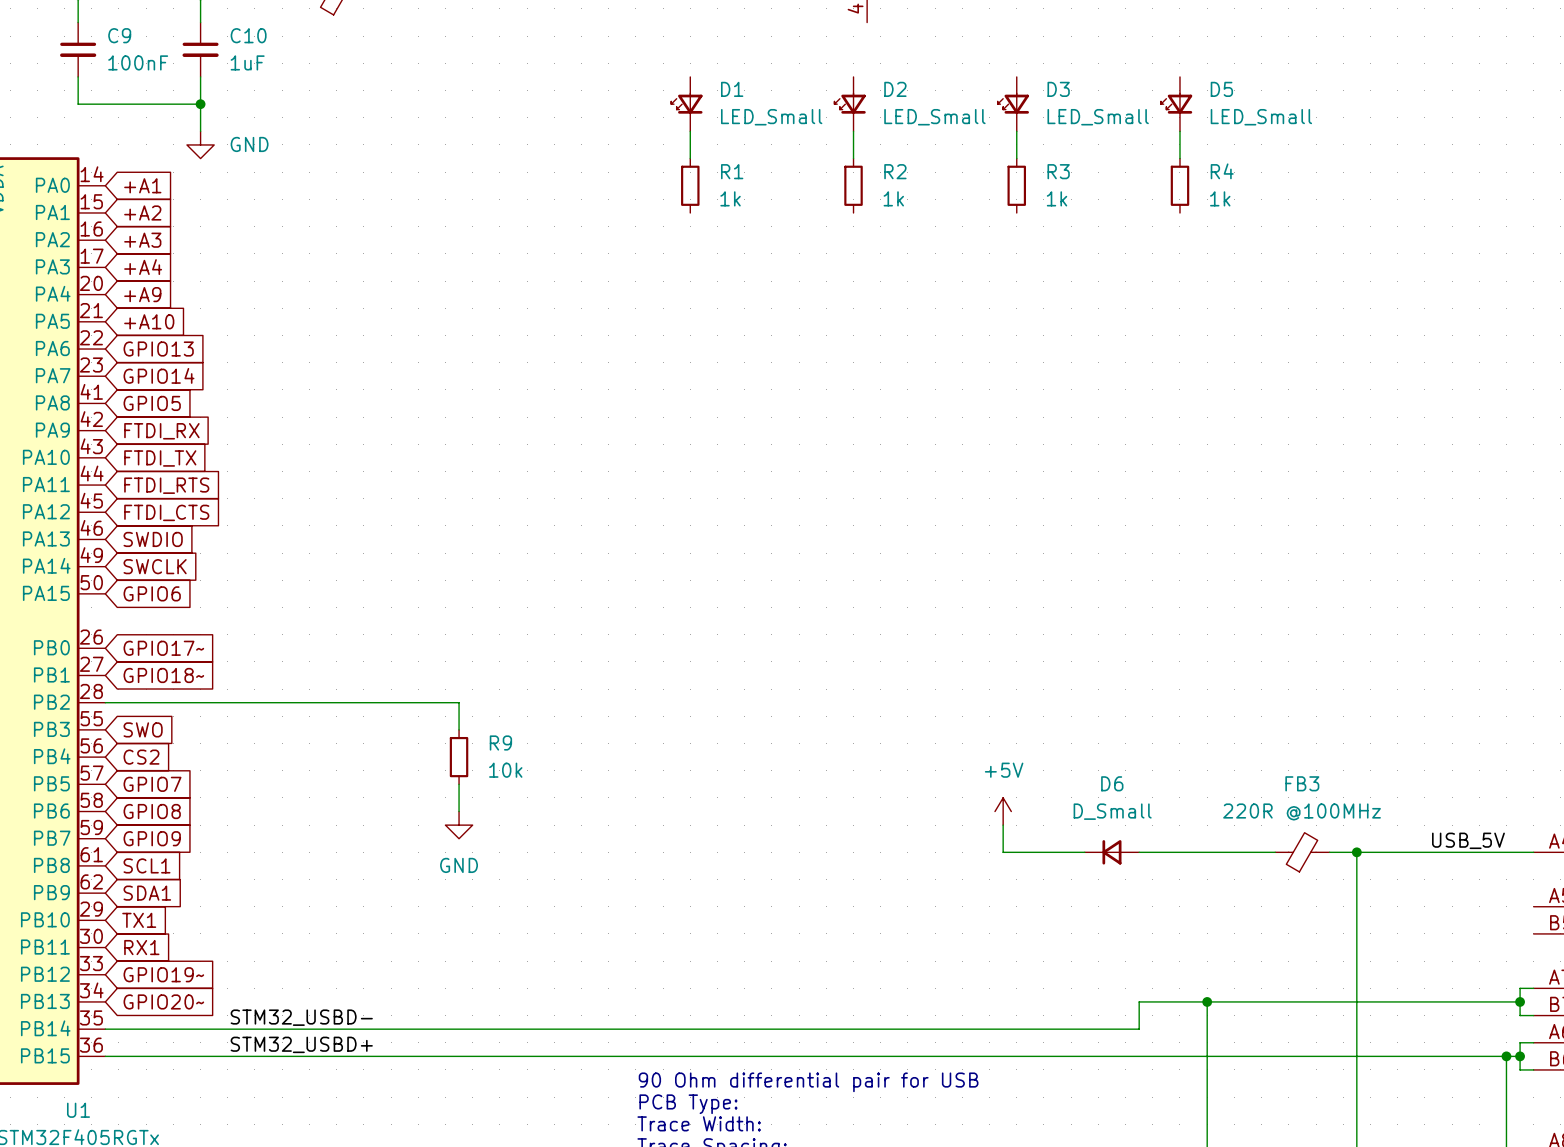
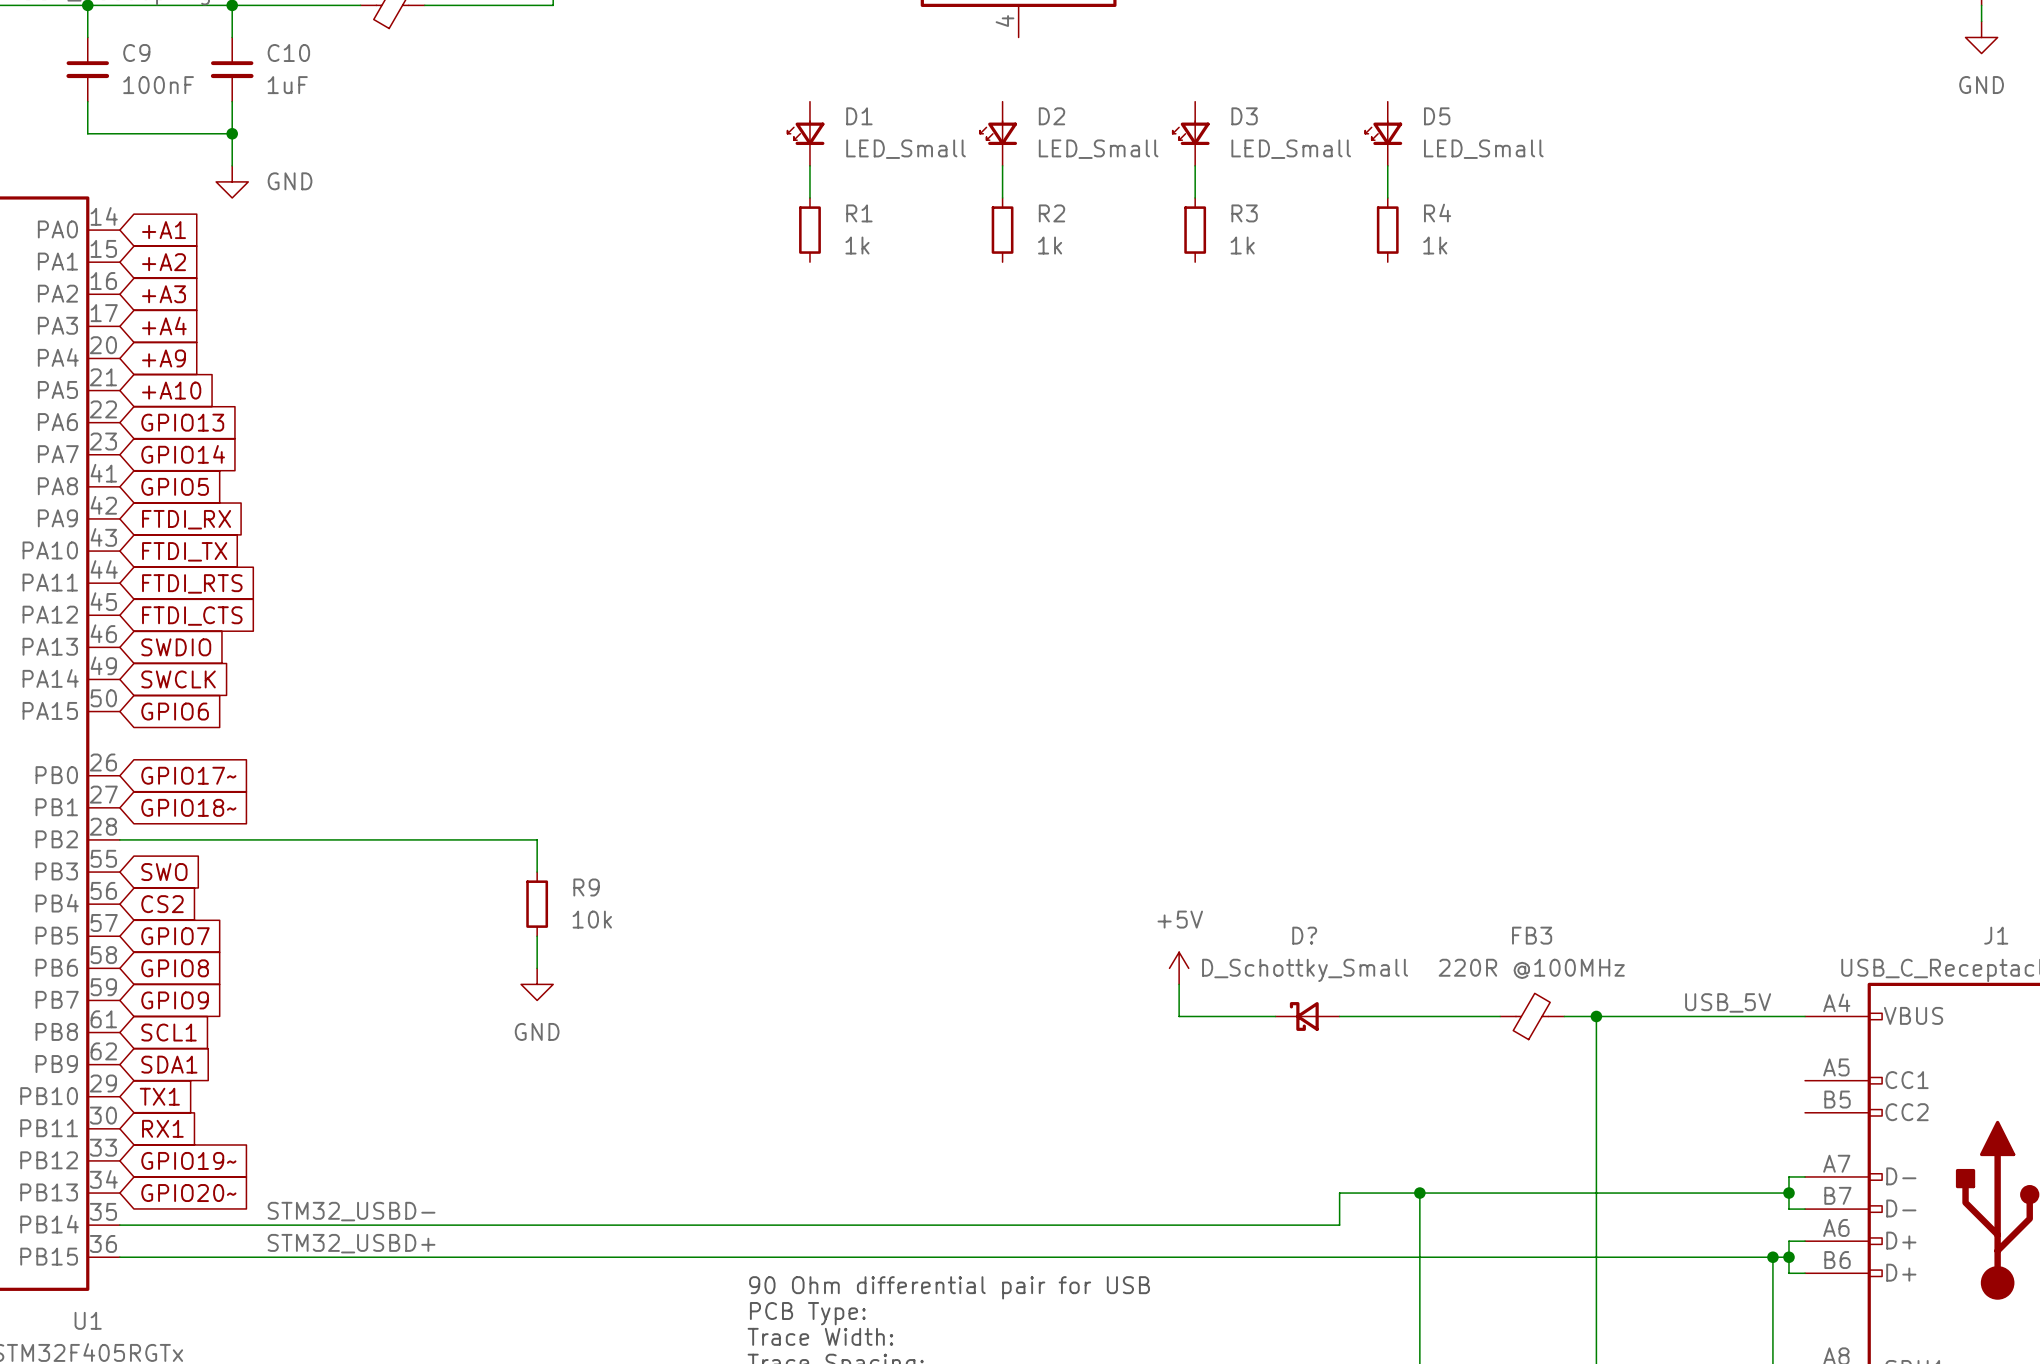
D6: D_Small (1111, 852) -> none
D?: none -> D_Schottky_Small (1307, 1016)

